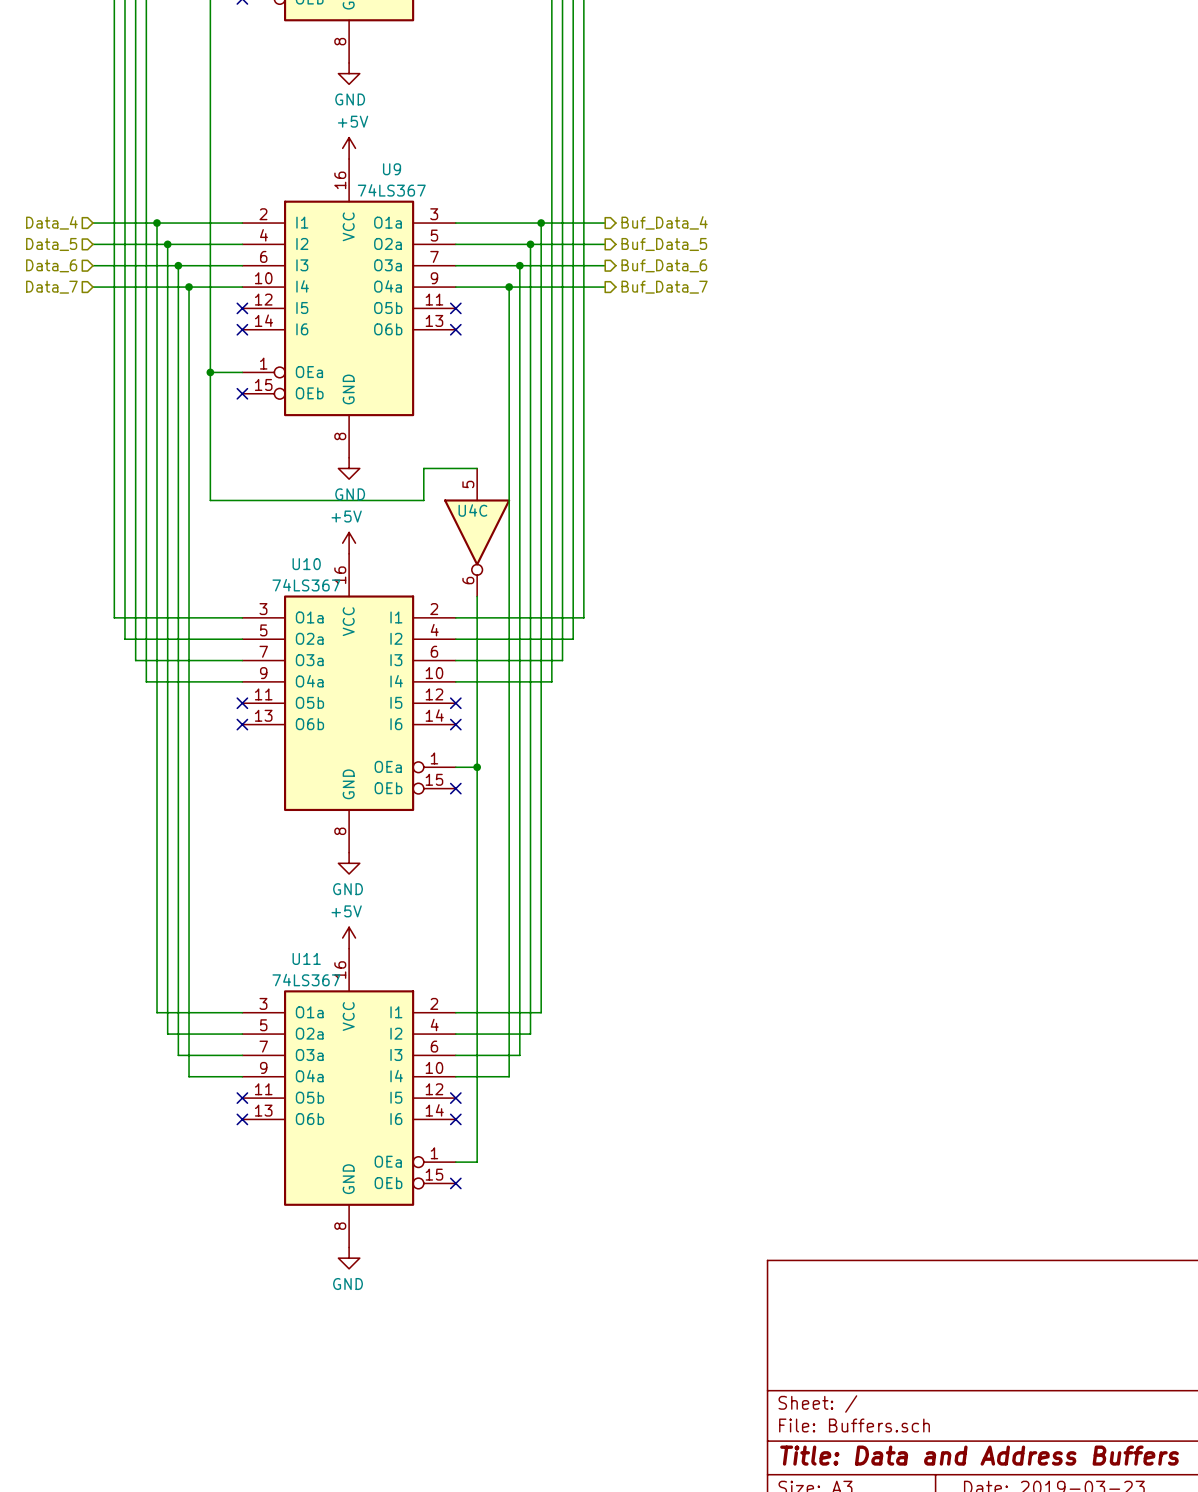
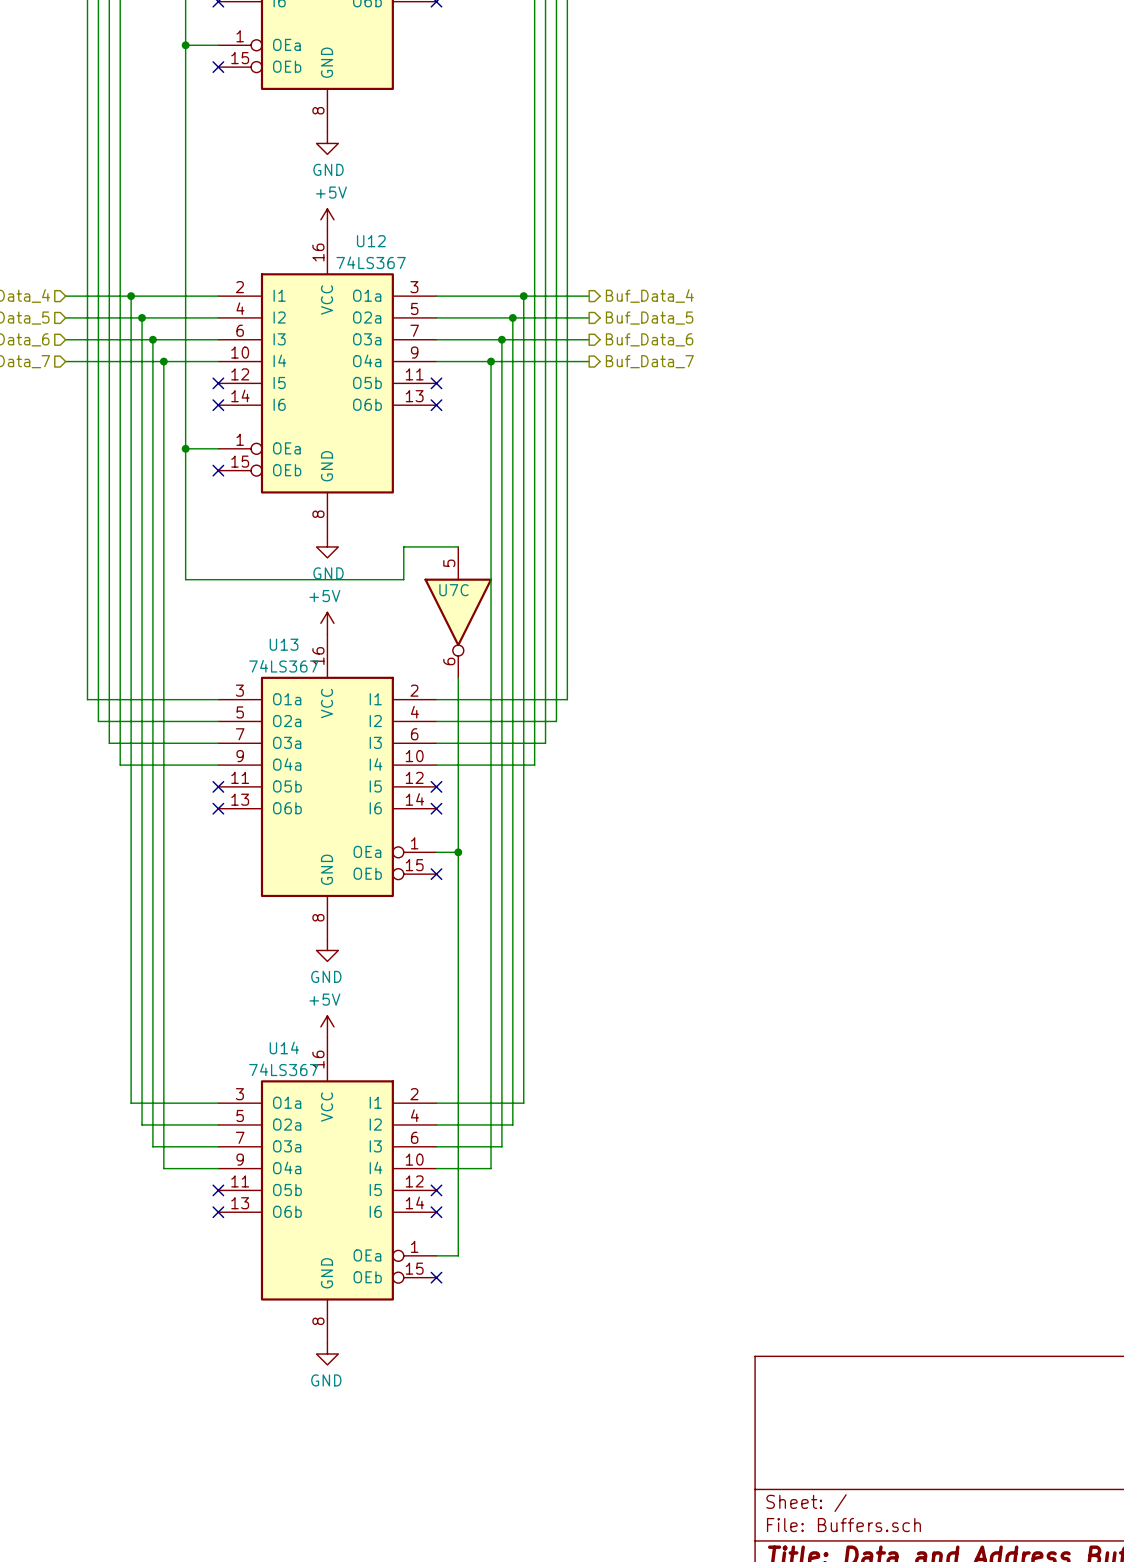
U9 name: U9 (392, 169) -> U12 (371, 241)
U4C name: U4C (472, 510) -> U7C (453, 590)
U10 name: U10 (306, 564) -> U13 (284, 644)
U11 name: U11 (306, 958) -> U14 (284, 1047)

